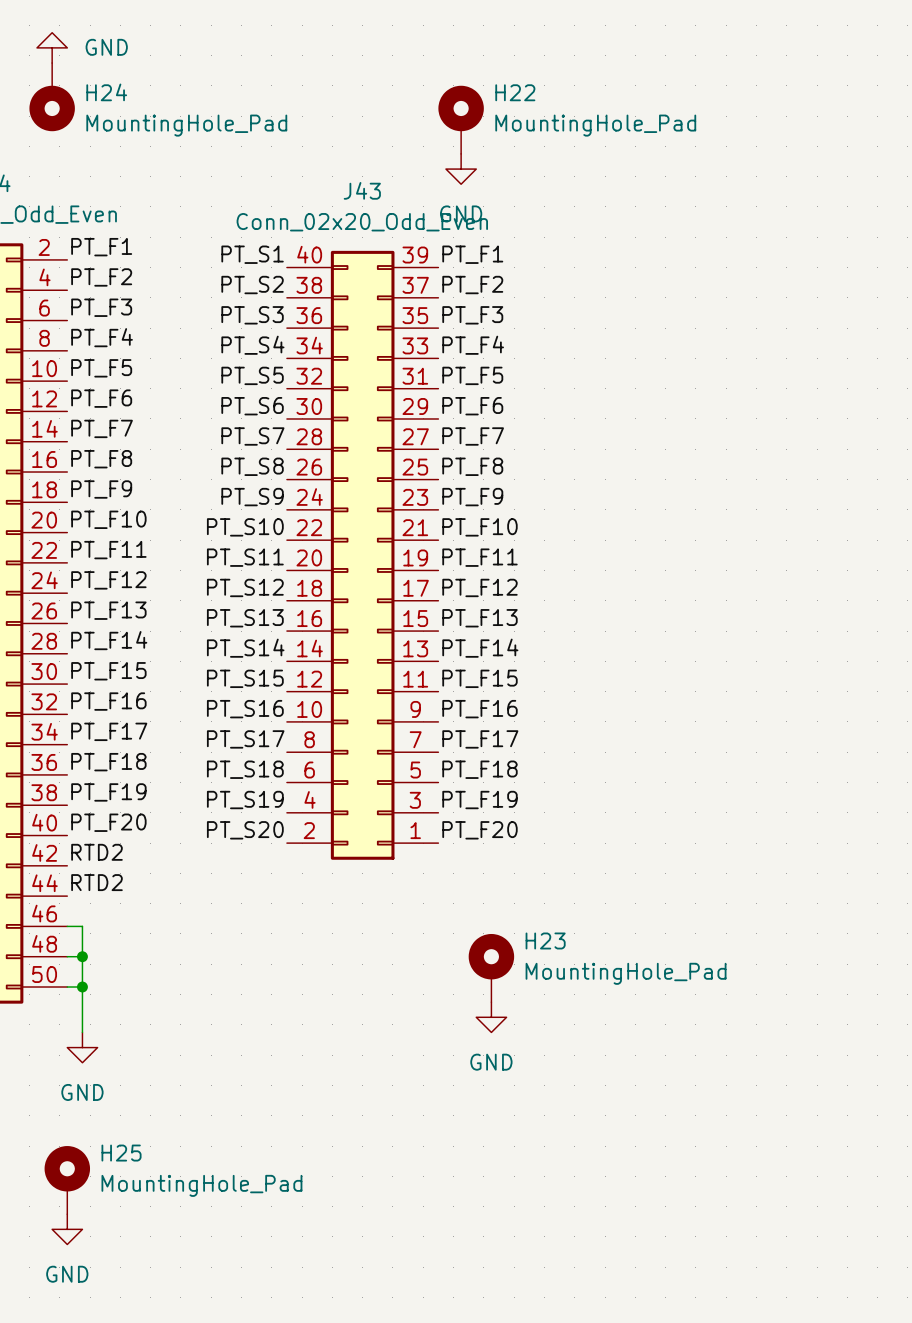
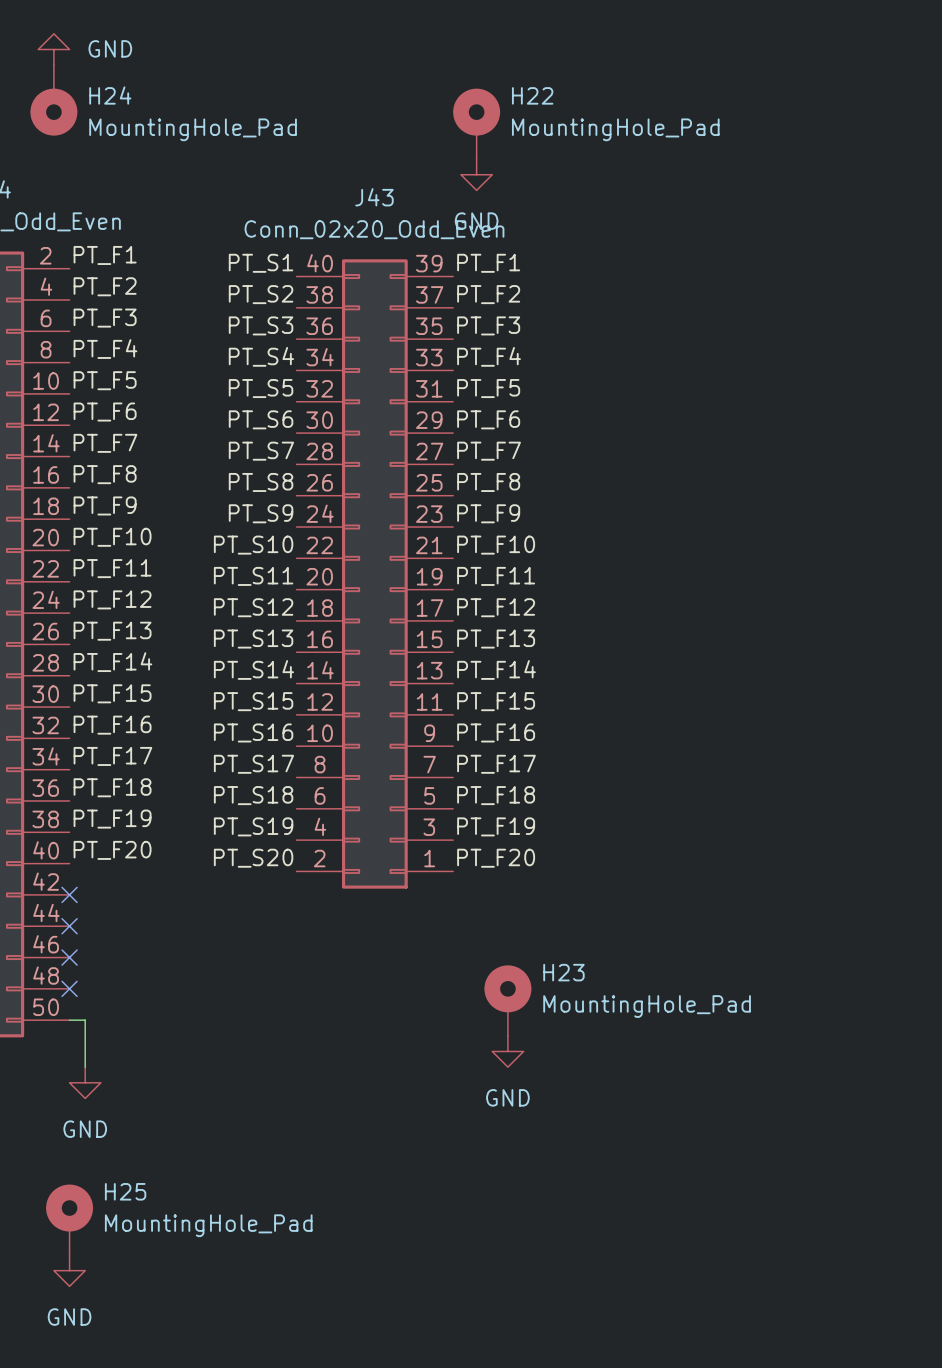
label: RTD2 (96, 852) -> none
no-connect mark: none -> (69, 894)
label: RTD2 (96, 882) -> none
no-connect mark: none -> (69, 926)
wire: (67, 926) (82, 926) (82, 987) -> none
no-connect mark: none -> (69, 957)
wire: (67, 956) (82, 956) -> none
no-connect mark: none -> (69, 988)
junction: (82, 956) -> none
junction: (82, 987) -> none

